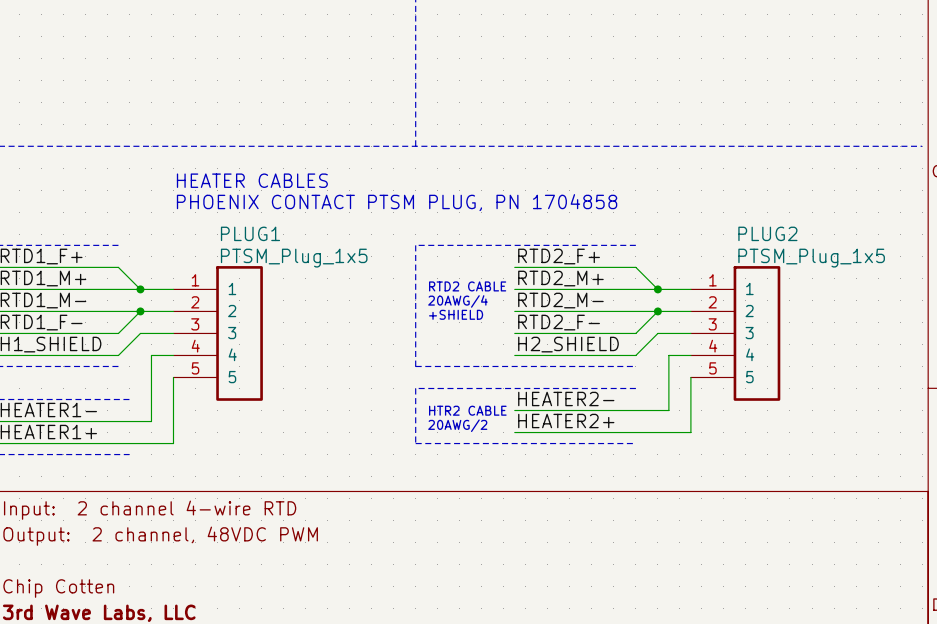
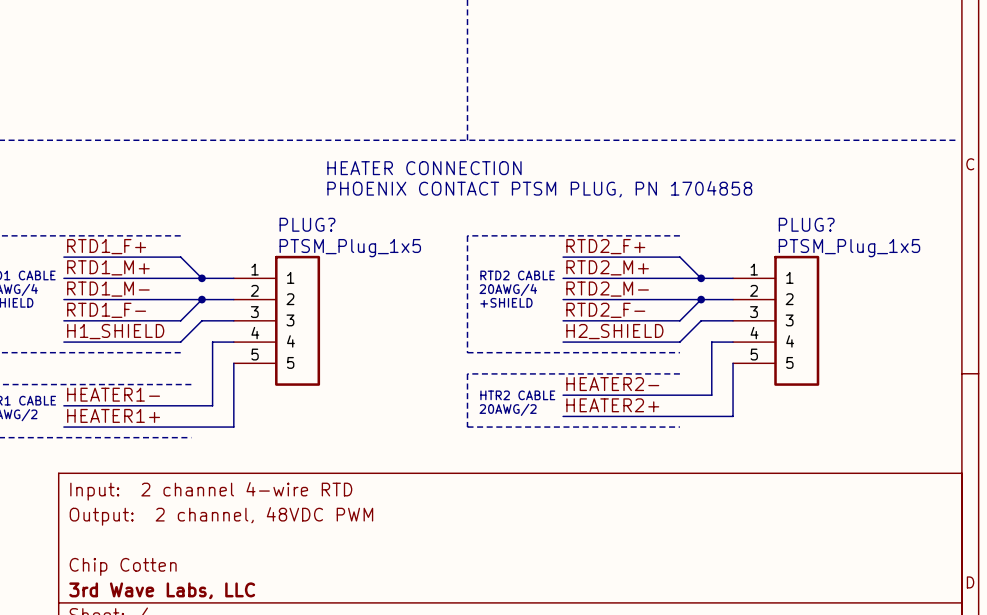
text: none -> HEATER CONNECTION (424, 168)
text: HEATER CABLES (252, 180) -> none
text position: PHOENIX CONTACT PTSM PLUG, PN 1704858 (397, 202) -> PHOENIX CONTACT PTSM PLUG, PN 1704858 (539, 189)
PLUG1 name: PLUG1 (250, 233) -> PLUG? (307, 224)
PLUG2 name: PLUG2 (767, 233) -> PLUG? (806, 224)

